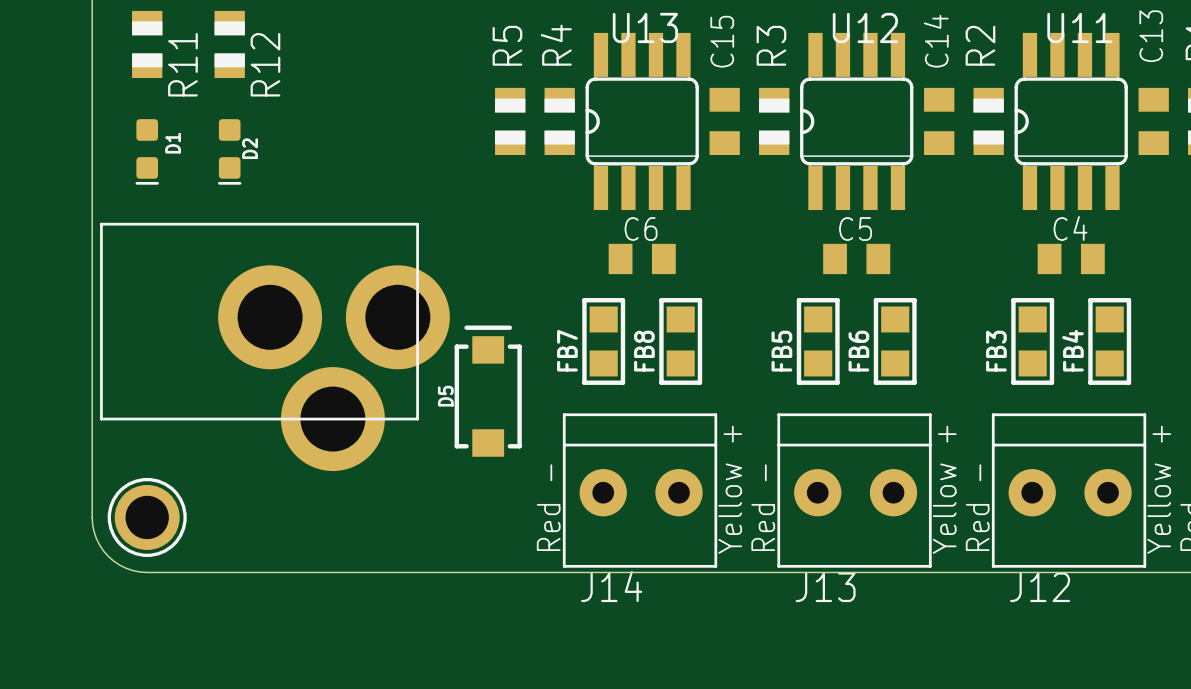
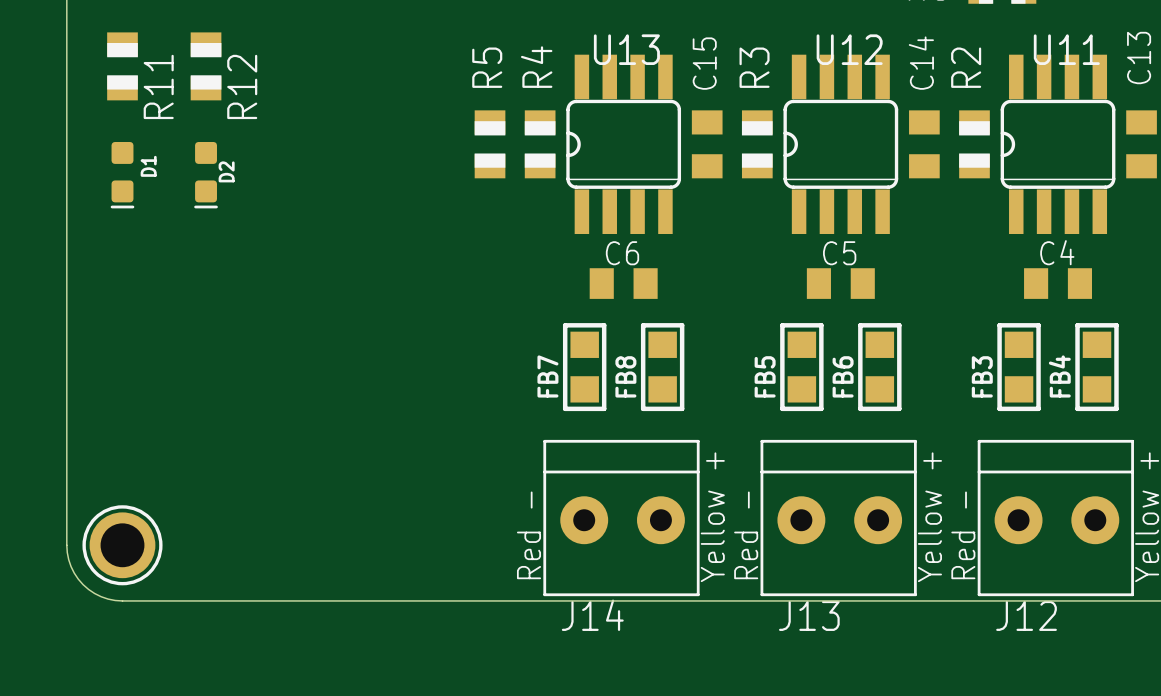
part: (274, 346) -> none
D5: (488, 391) -> none

